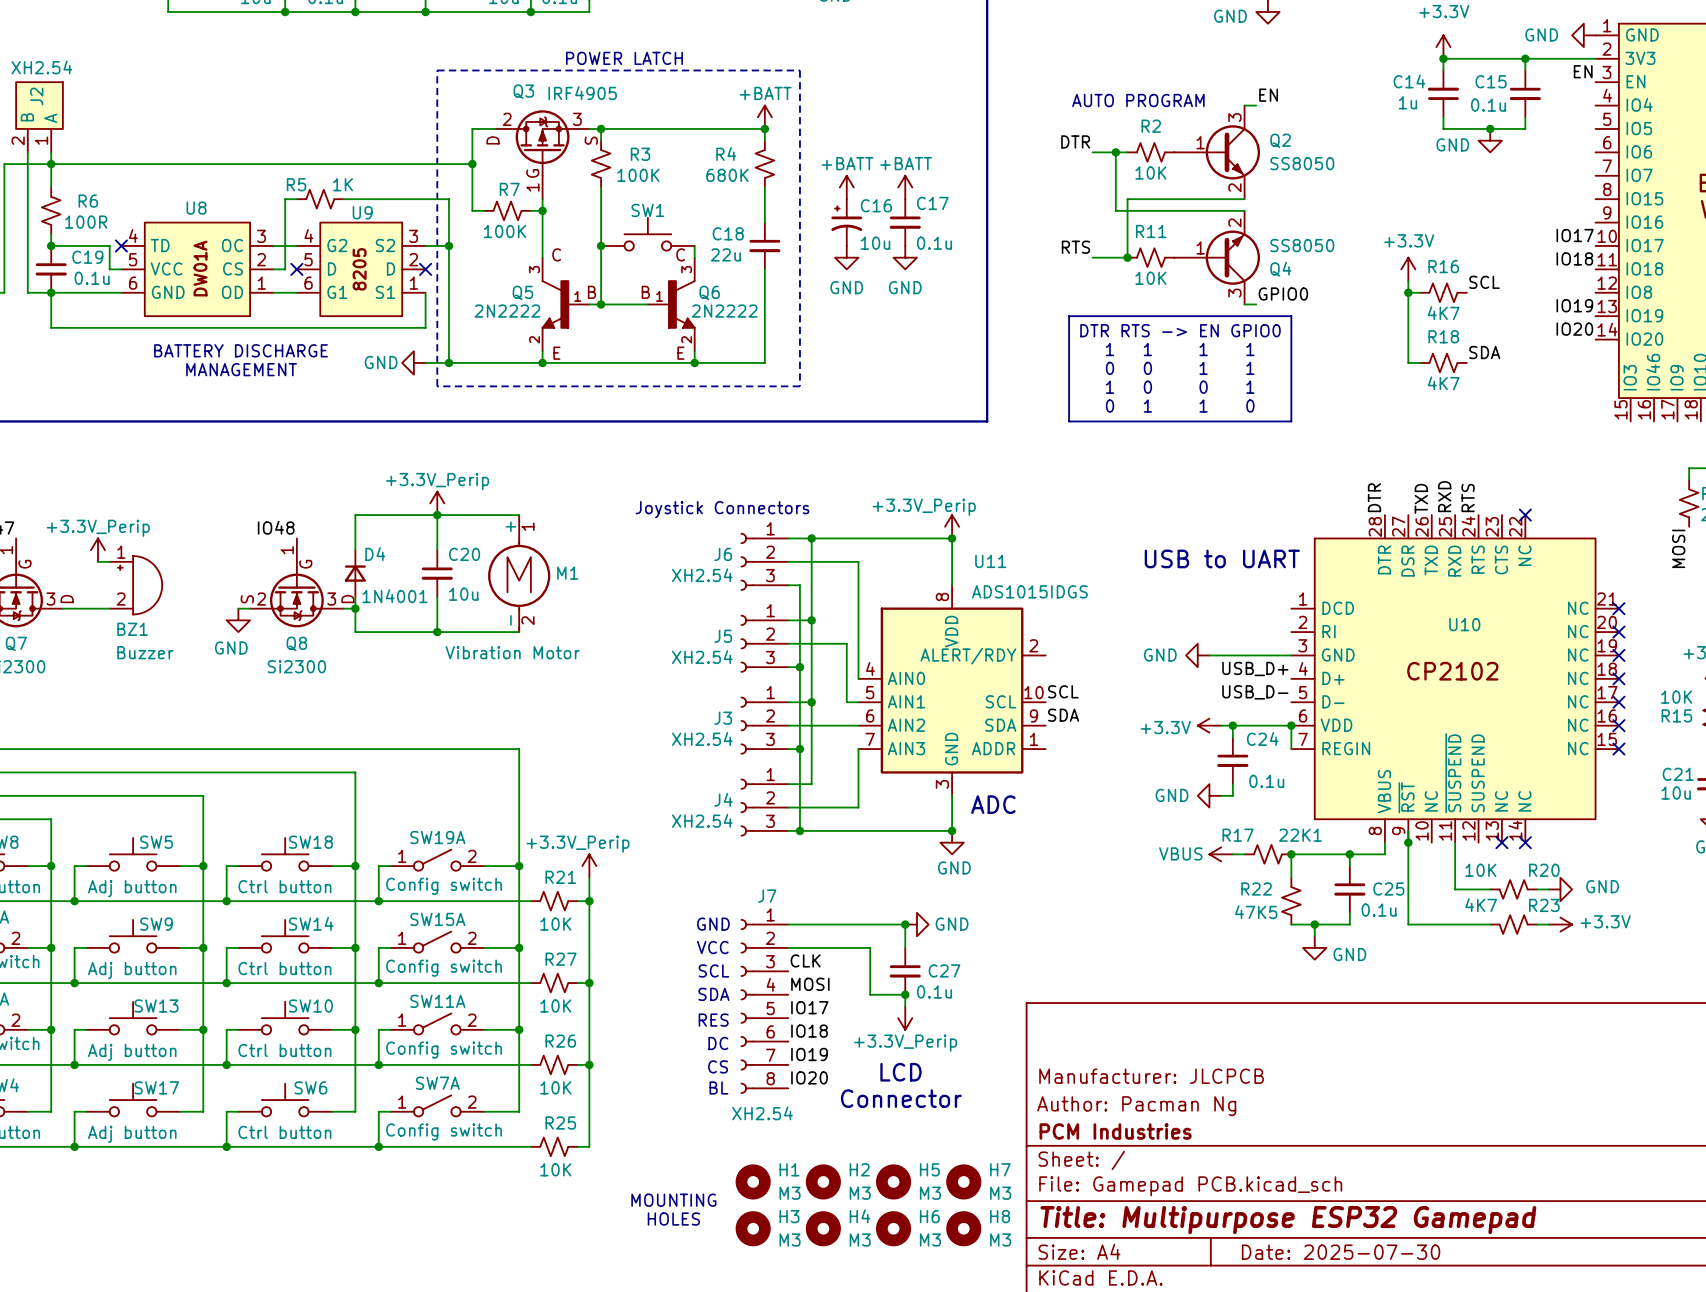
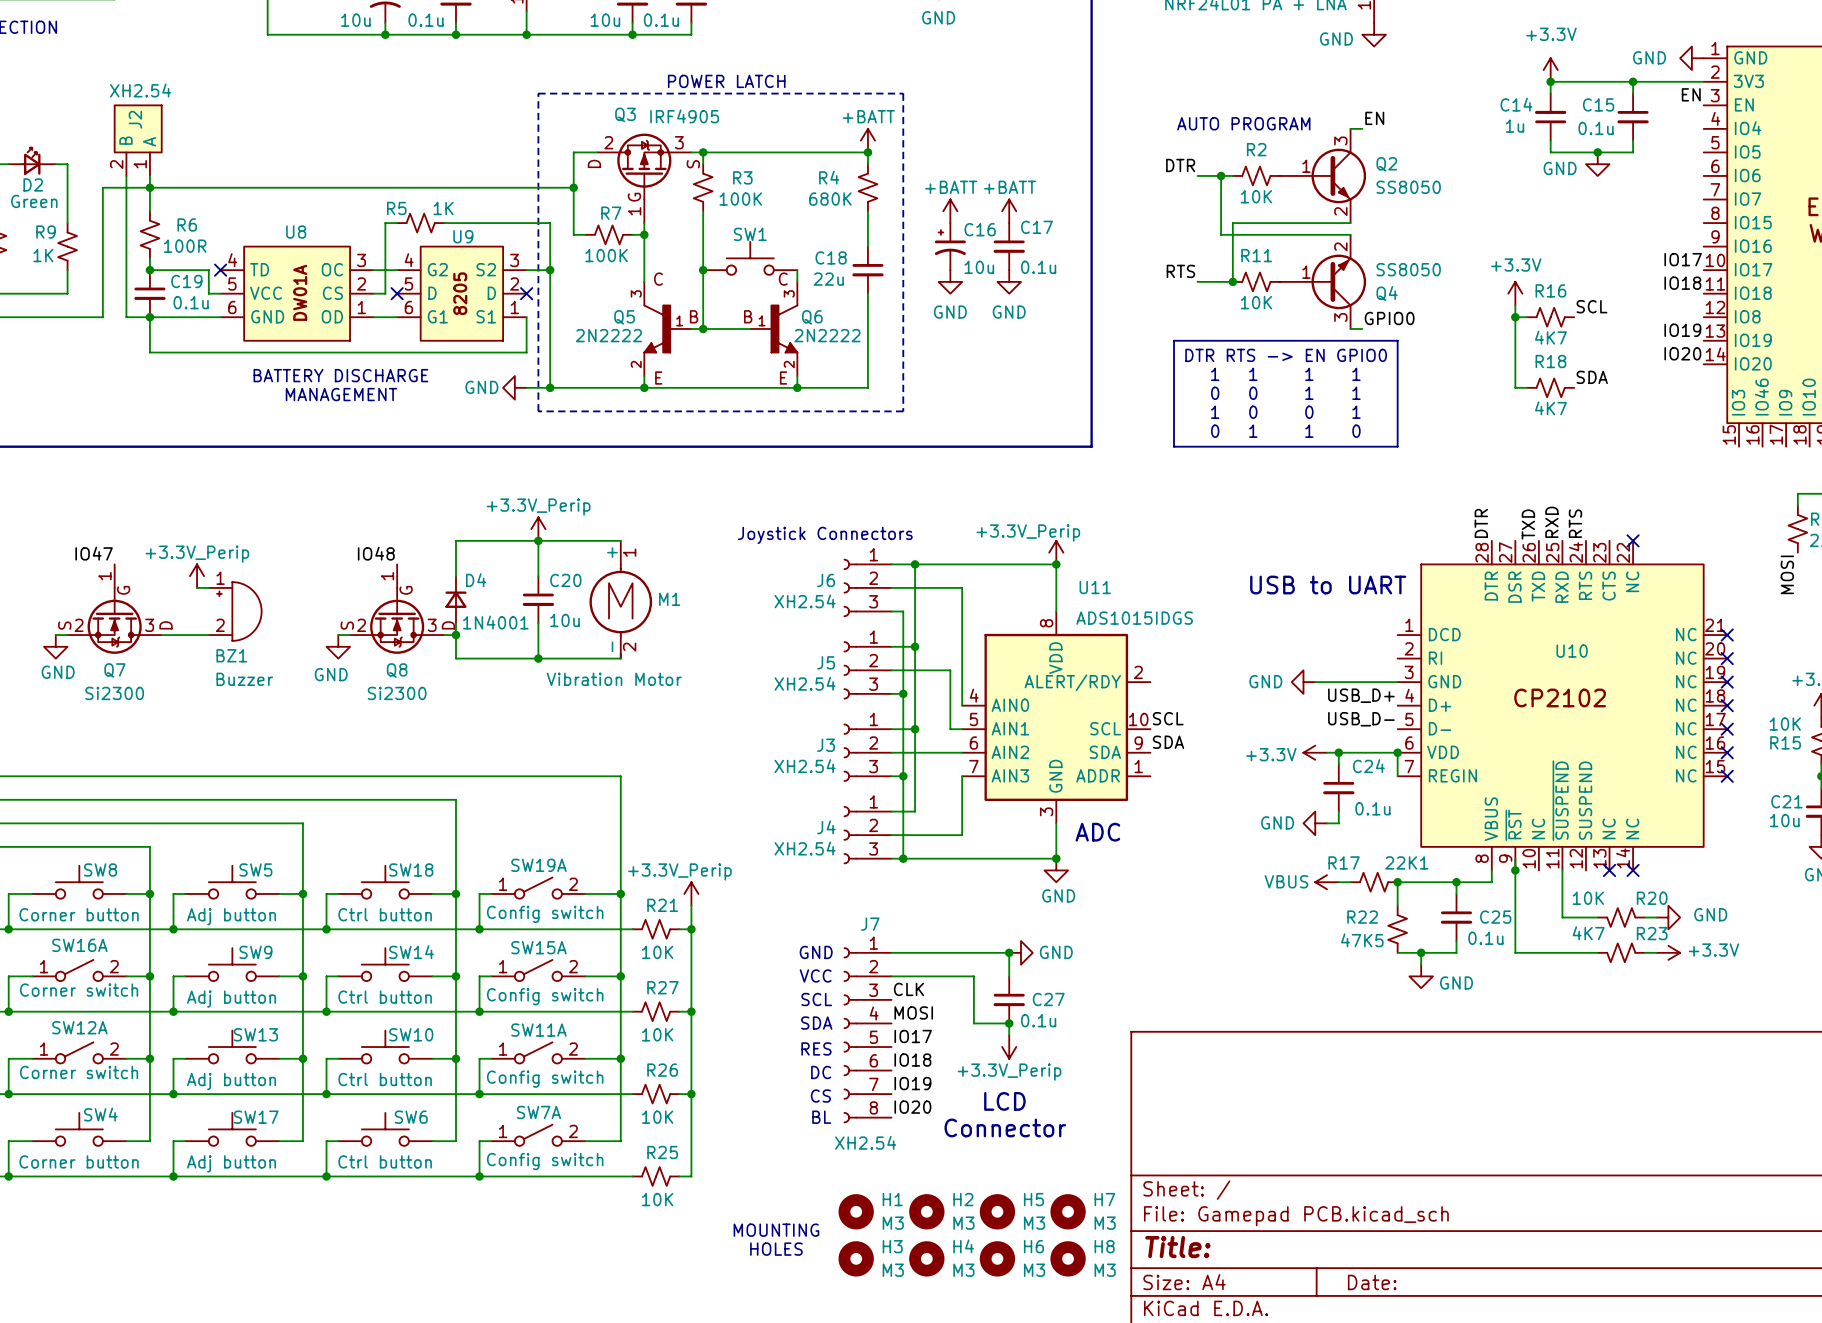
title block: Manufacturer: JLCPCB (1151, 1076) -> none
title block: Author: Pacman Ng (1136, 1106) -> none
title block: PCM Industries (1115, 1131) -> none
title block: Title: Multipurpose ESP32 Gamepad (1288, 1220) -> Title: (1177, 1247)
title block: Date: 2025-07-30 (1341, 1252) -> Date: (1372, 1282)

